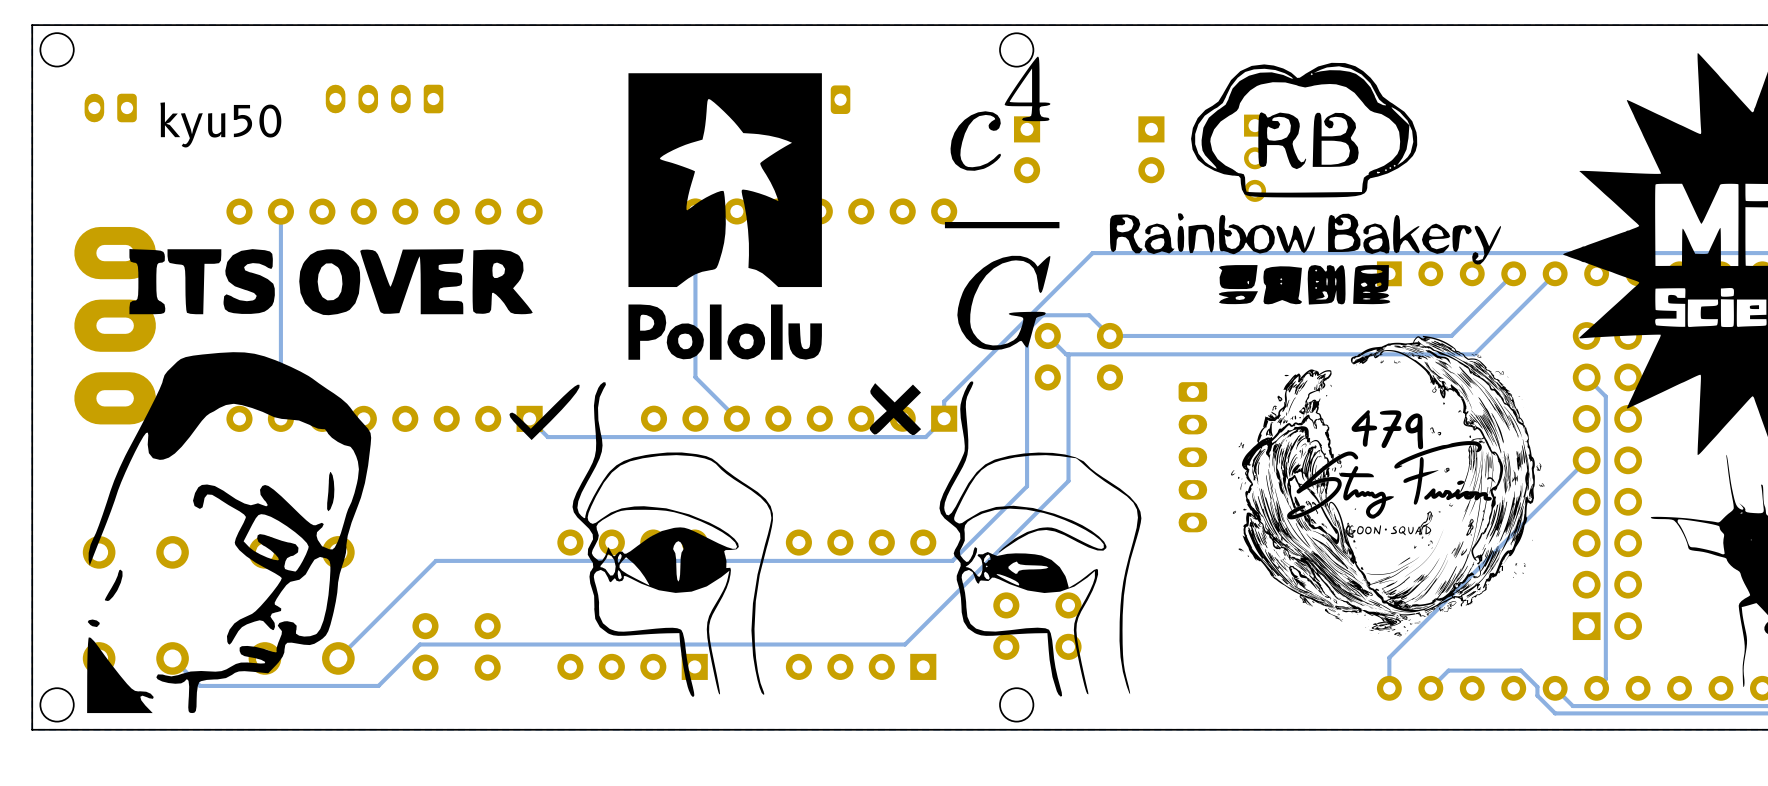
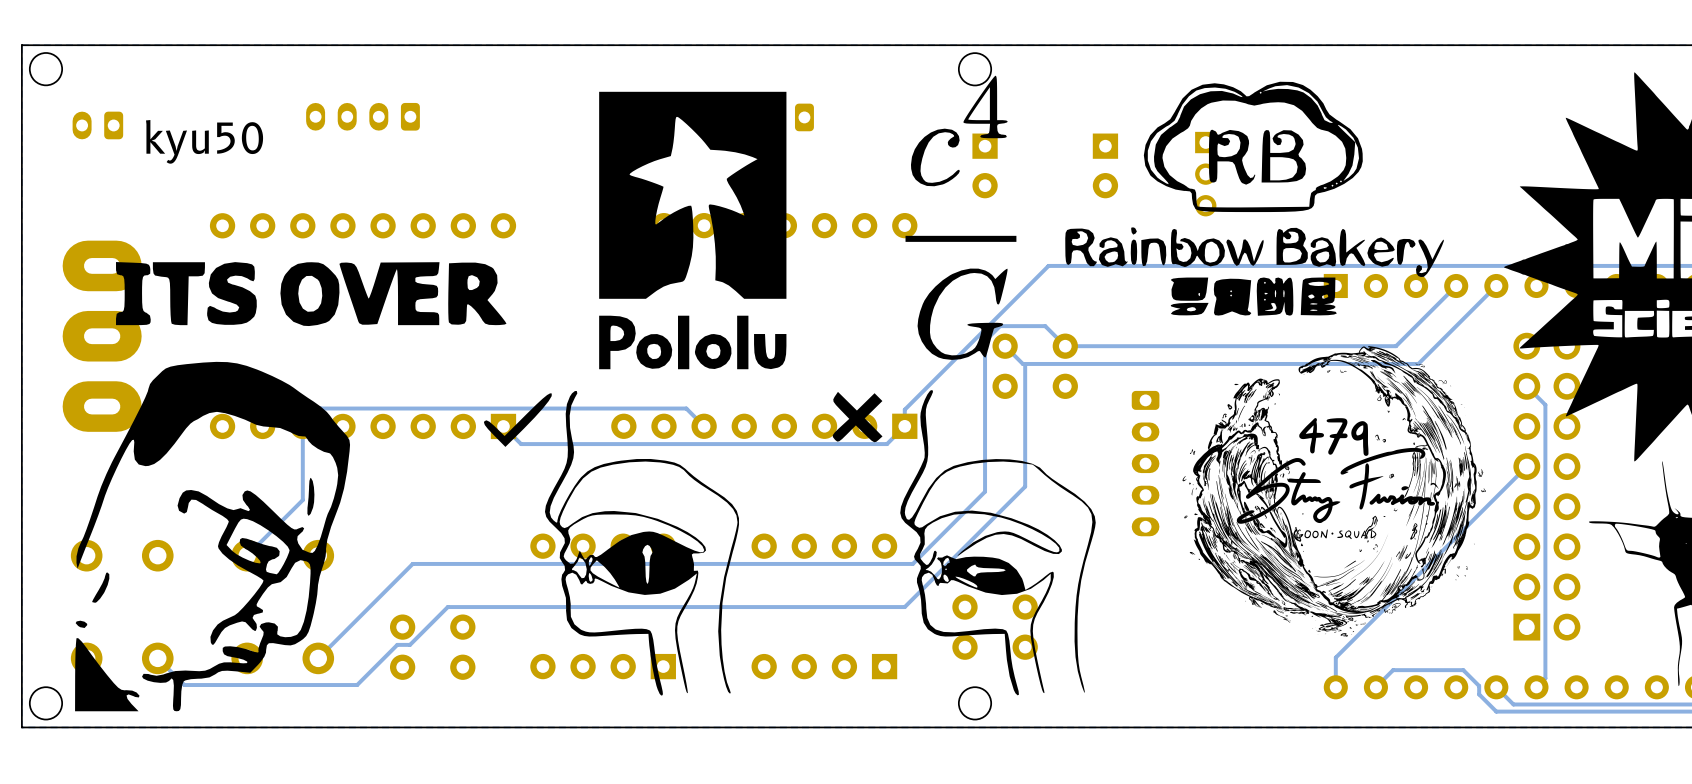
track: (280, 211) (280, 377) (322, 418) -> none
track: (695, 211) (695, 377) (718, 400) -> (247, 555) (302, 500) (302, 426) (320, 408) (686, 408)
track: (944, 605) (905, 644) (433, 644) -> (904, 607) (447, 607) (409, 644)

